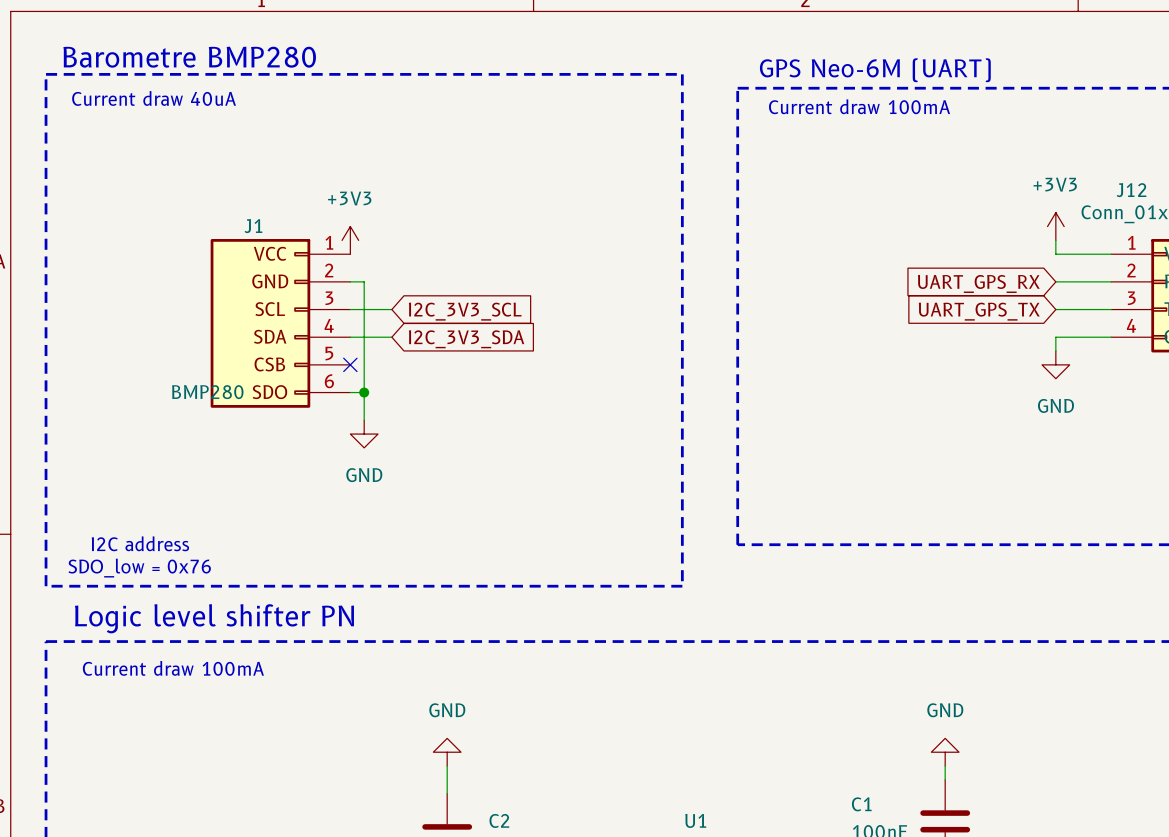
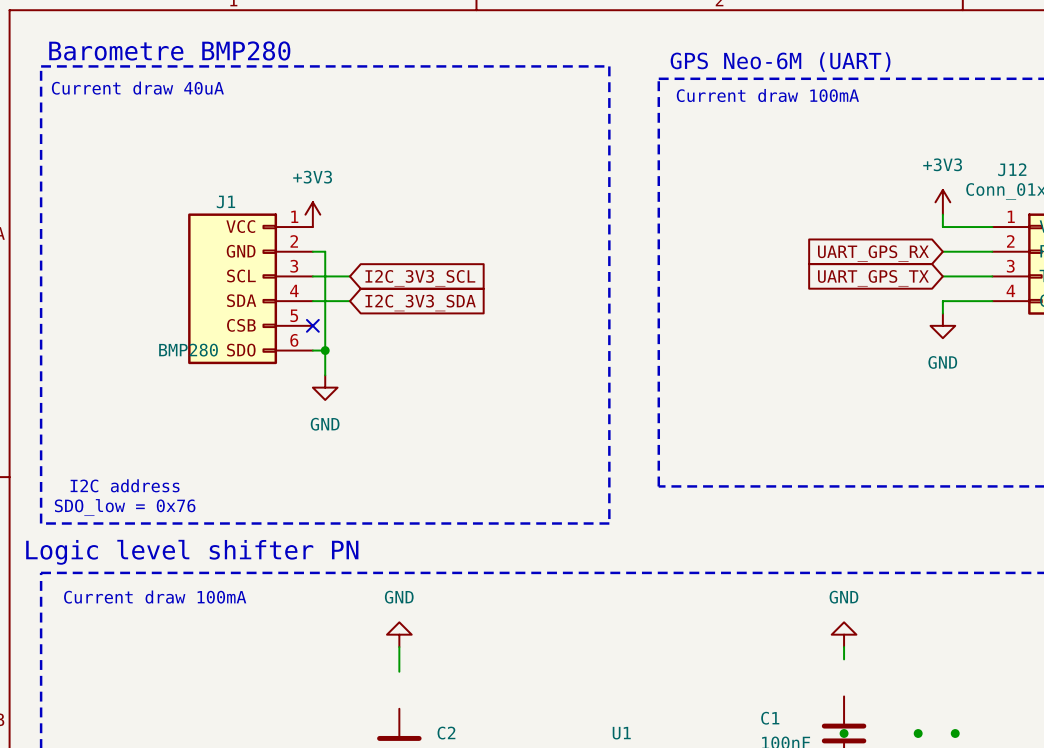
power symbol position: GND (447, 752) -> GND (399, 634)
power symbol position: GND (945, 752) -> GND (844, 634)
wire: (447, 766) (447, 793) -> (399, 647) (399, 671)
wire: (945, 766) (945, 779) -> (844, 647) (844, 659)
junction: none -> (844, 733)
junction: none -> (918, 733)
junction: none -> (955, 733)

